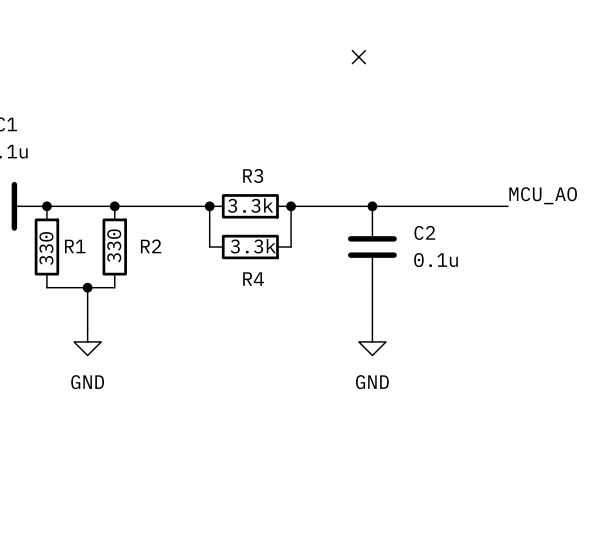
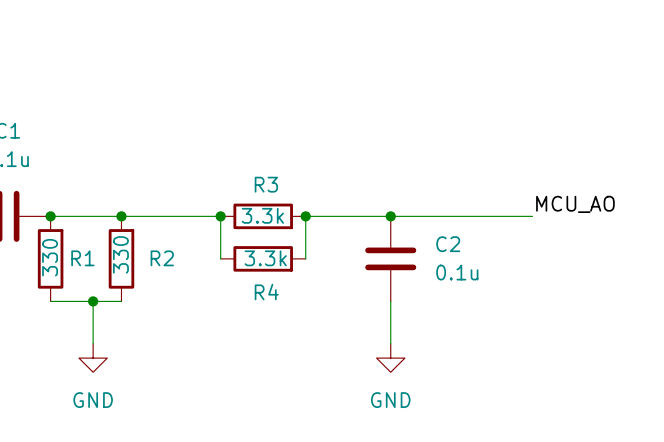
no-connect mark: (358, 57) -> none

